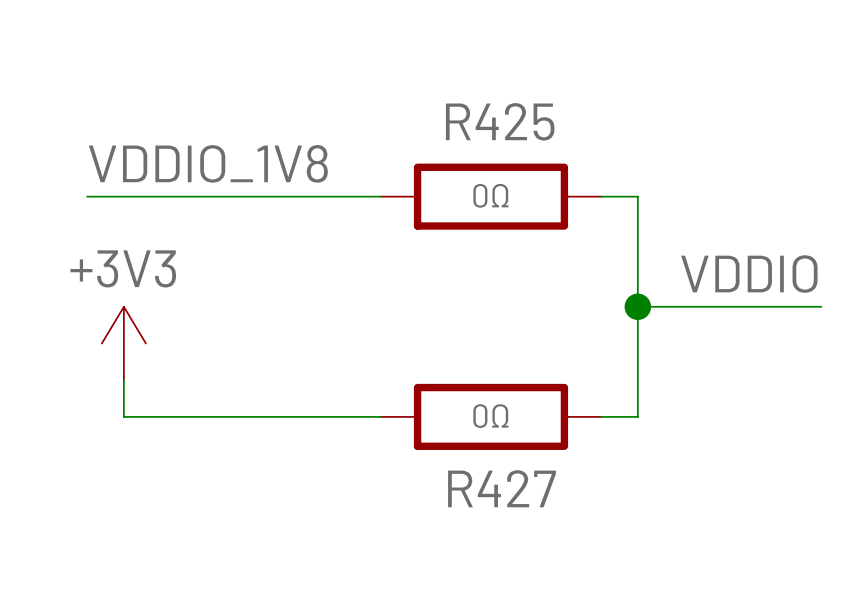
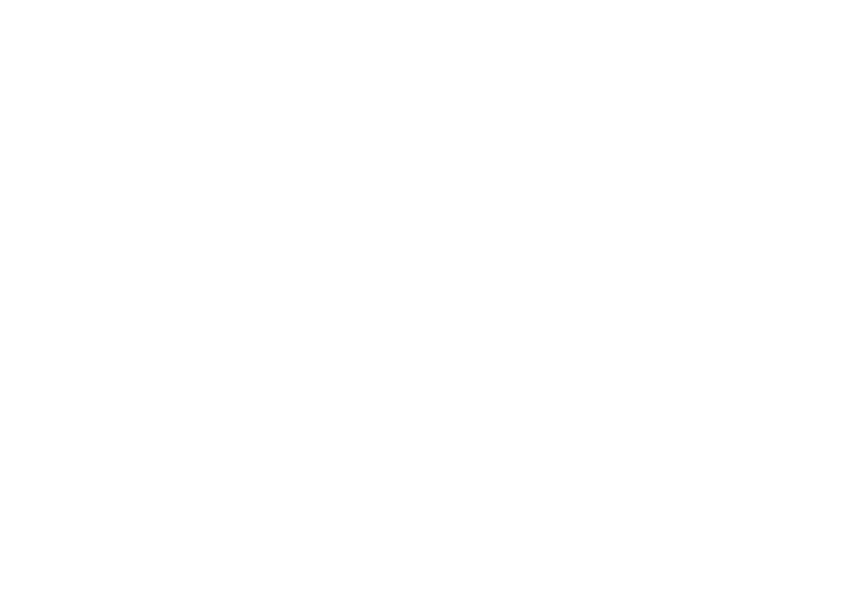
label: VDDIO_1V8 (208, 163) -> none
wire: (87, 196) (380, 196) -> none
R425: 0Ω (490, 196) -> none
wire: (601, 196) (637, 196) (637, 416) (601, 416) -> none
label: VDDIO (749, 274) -> none
wire: (637, 306) (821, 306) -> none
junction: (637, 306) -> none
power symbol: +3V3 (123, 343) -> none
wire: (123, 380) (123, 416) (380, 416) -> none
R427: 0Ω (490, 416) -> none

